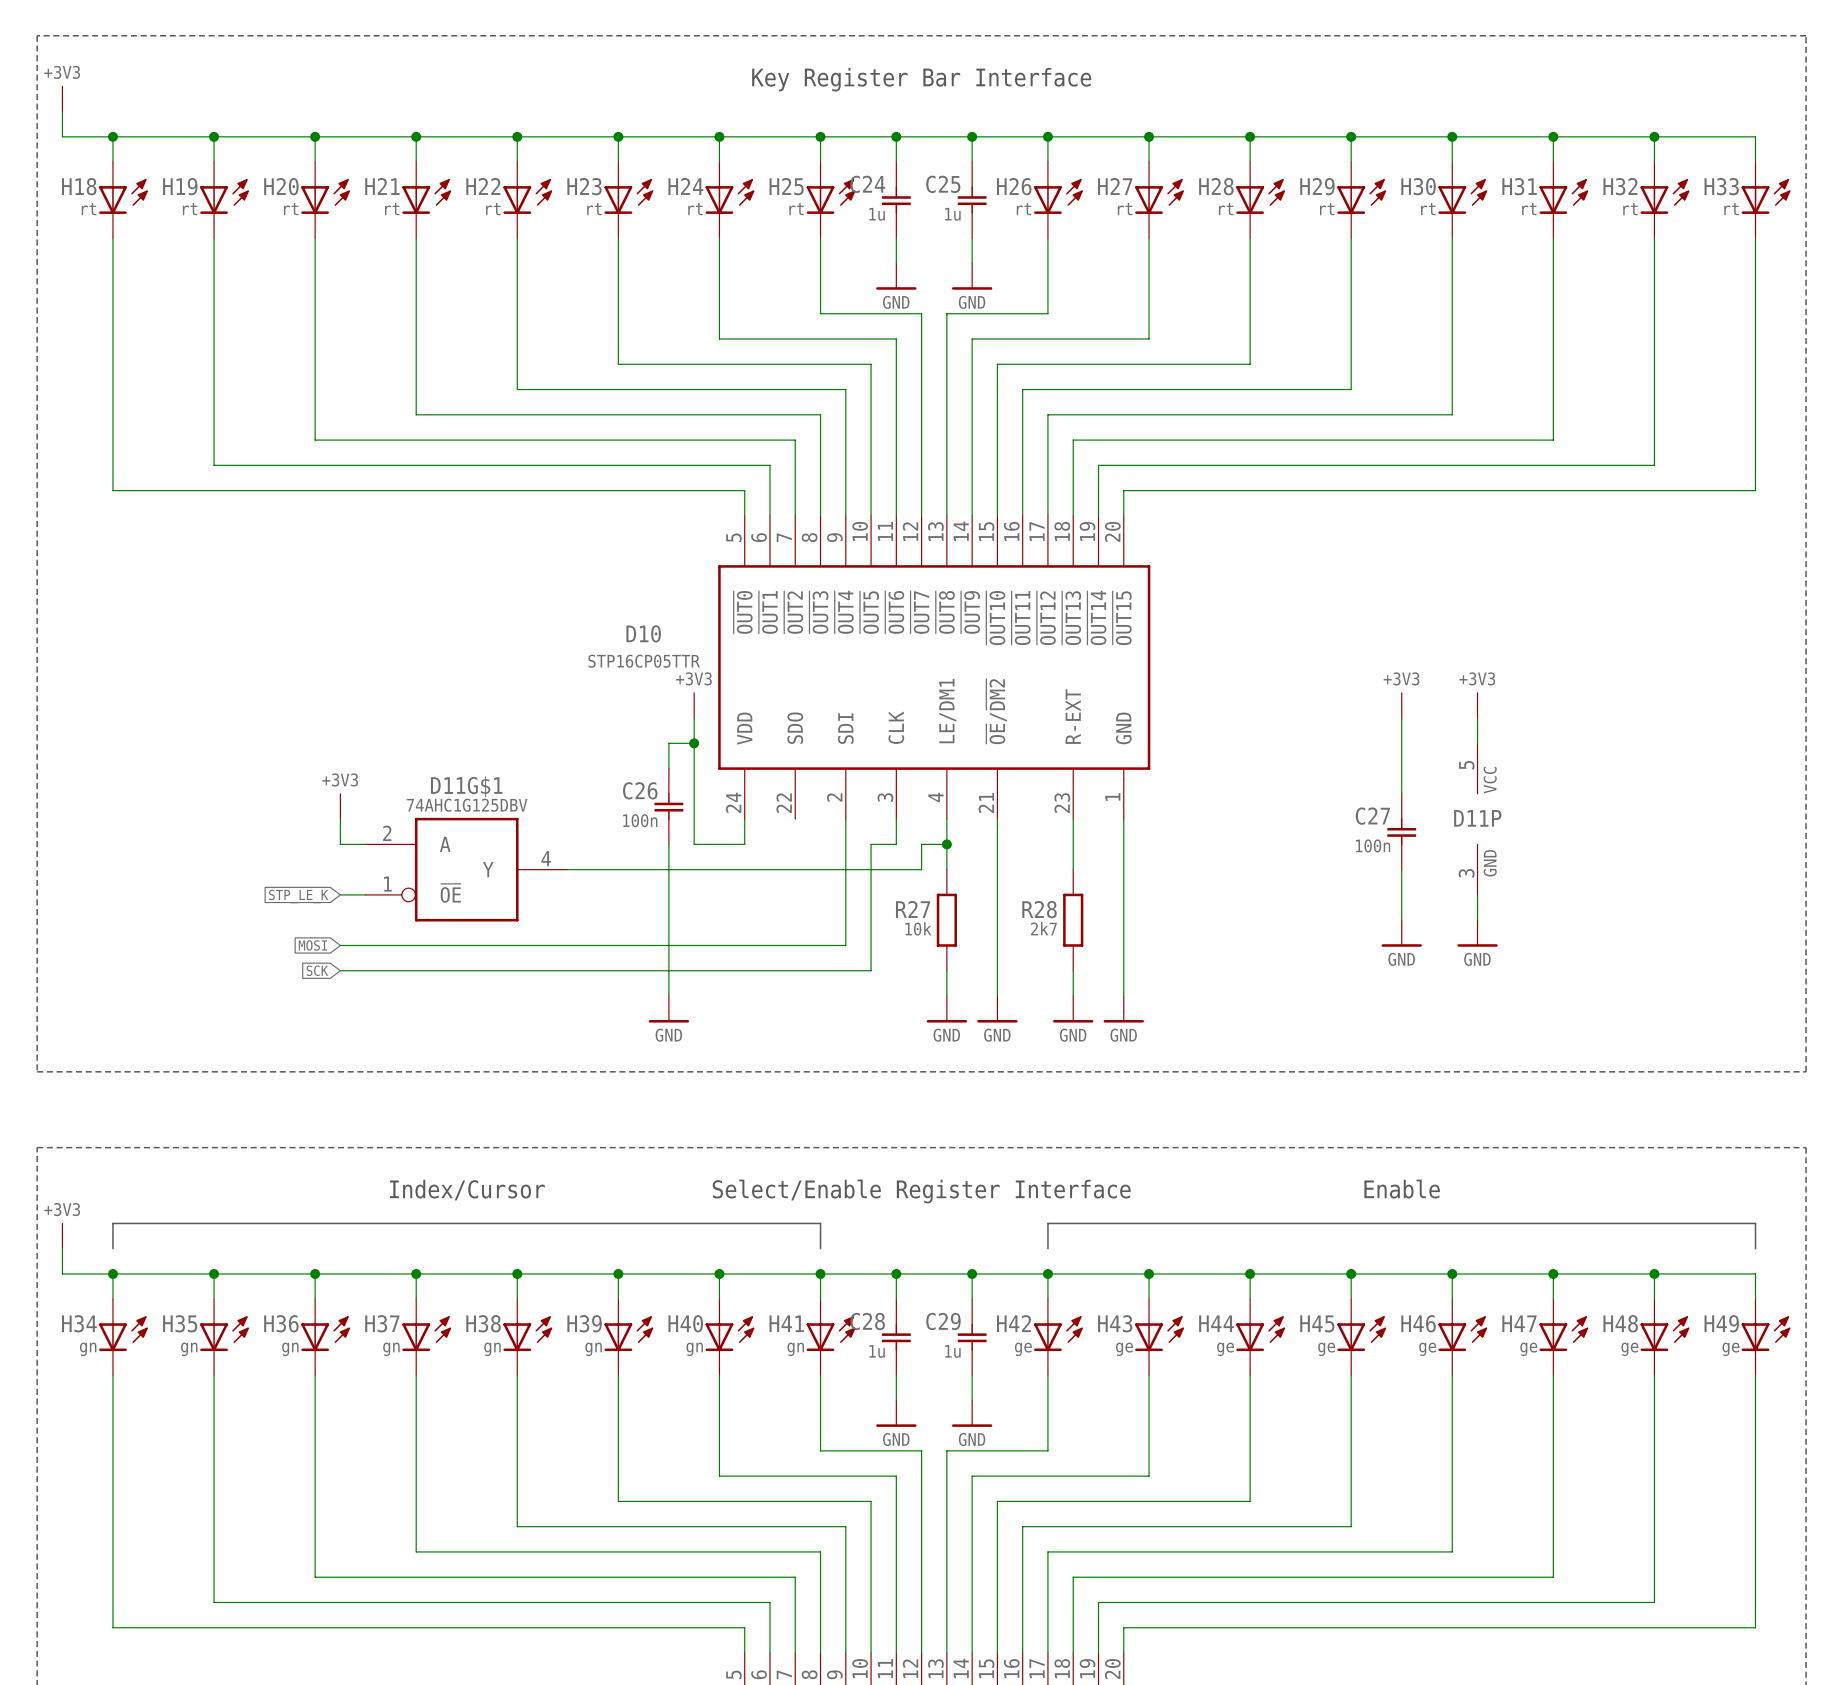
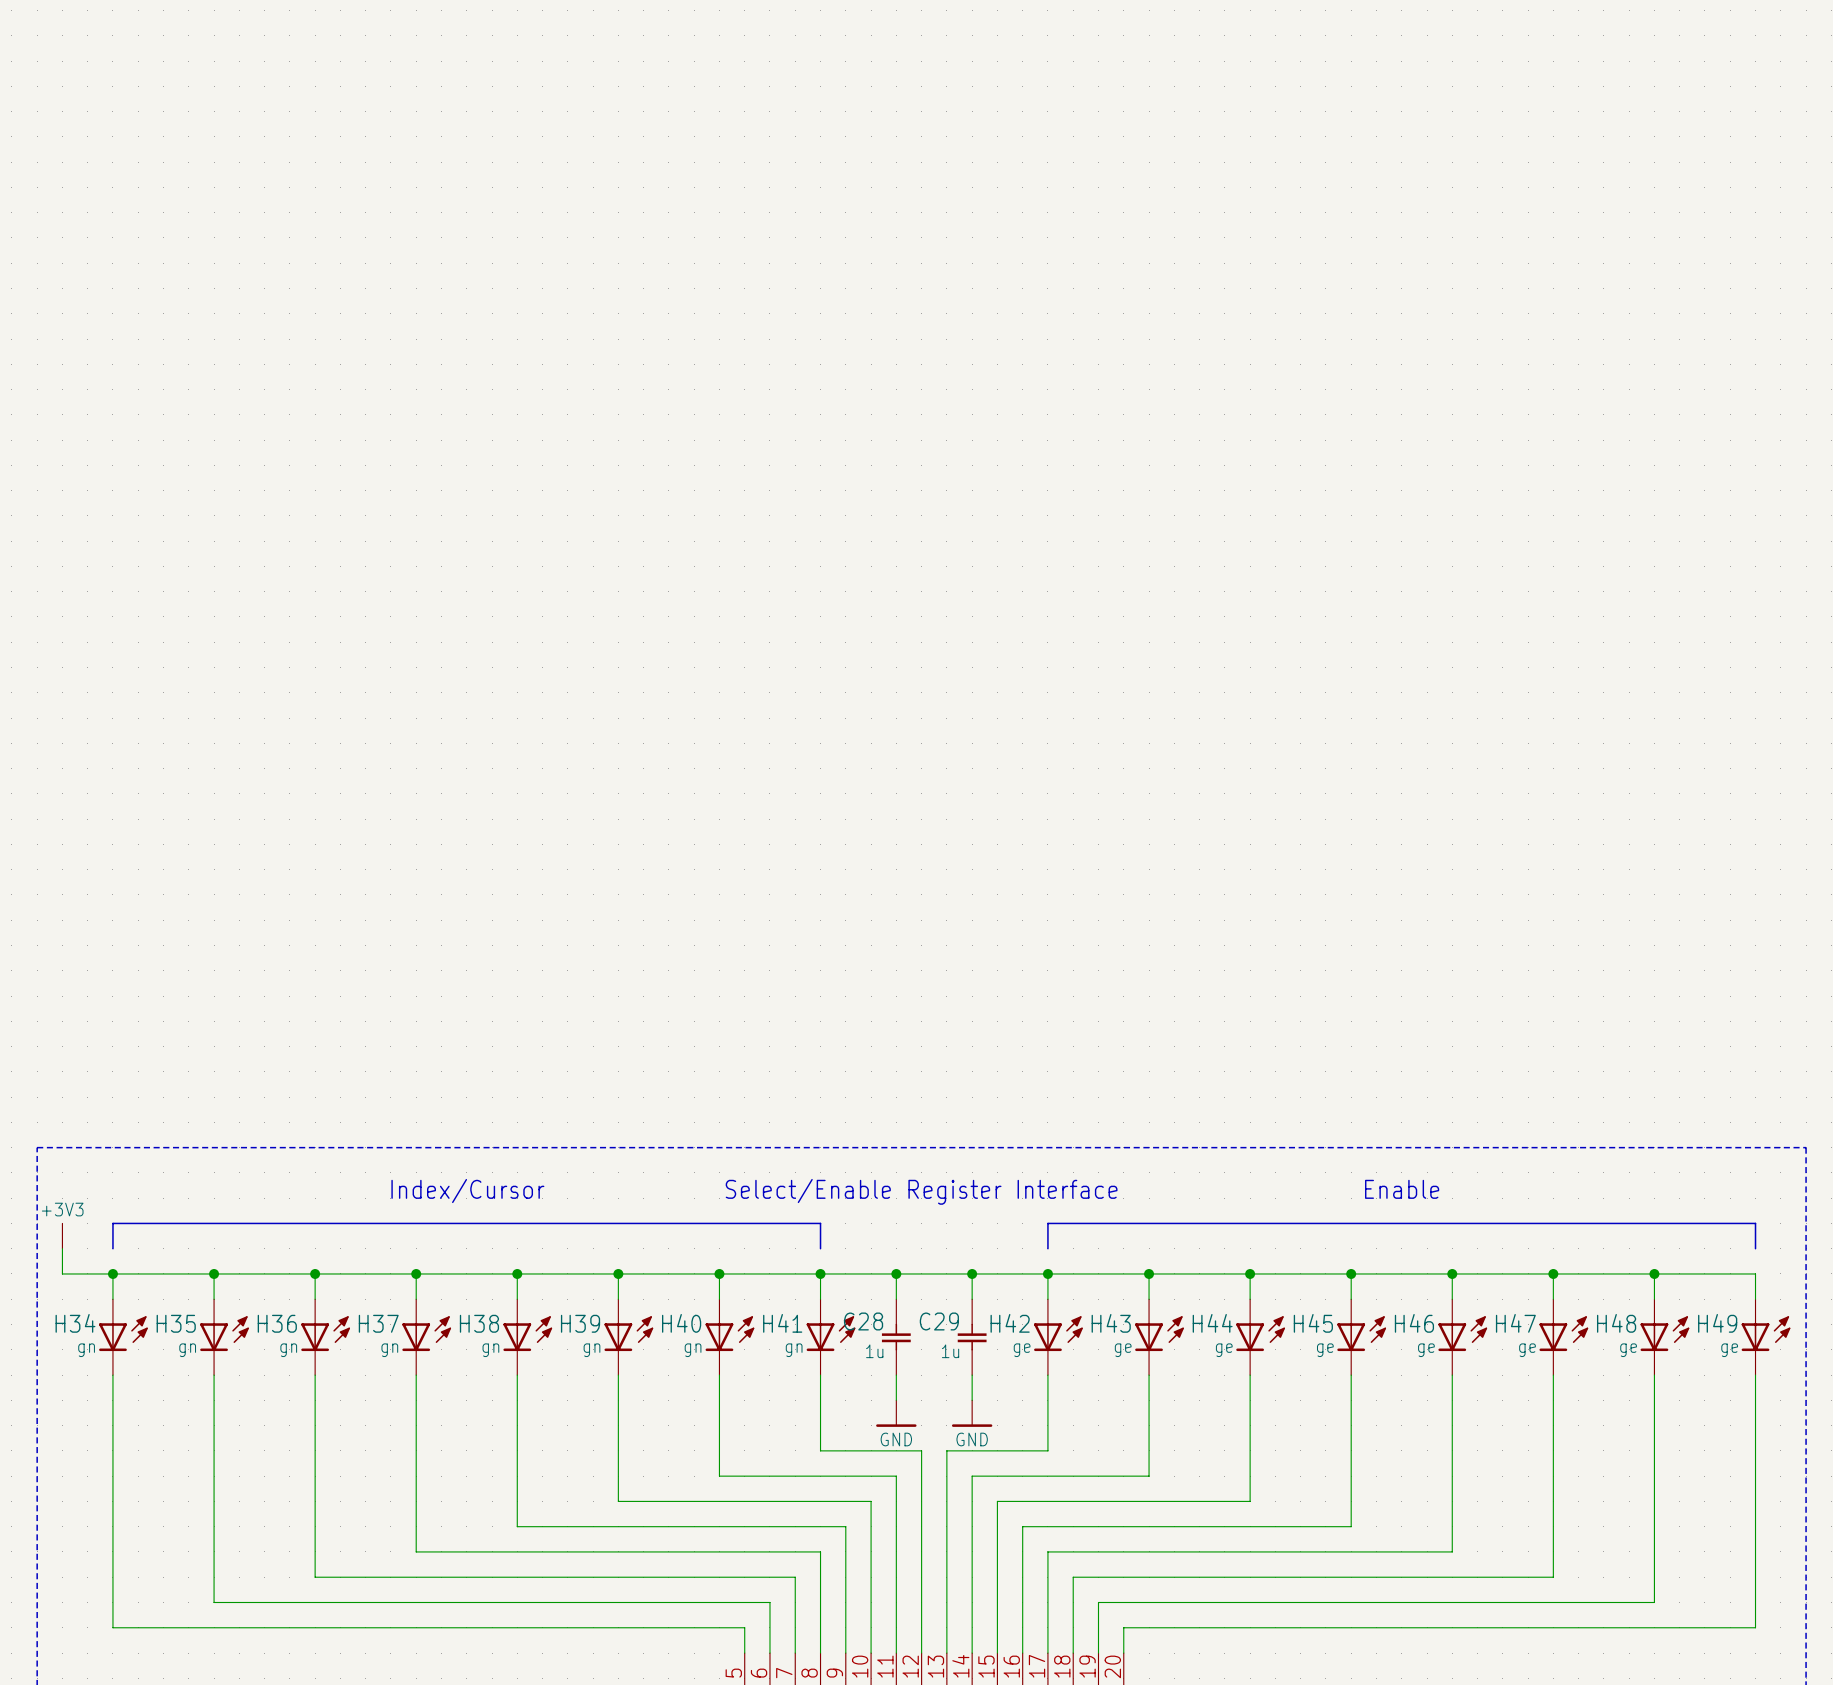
line: (37, 35) (37, 1071) (1806, 1071) (1806, 35) (37, 35) -> none
text: Key Register Bar Interface (921, 79) -> none
power symbol: +3V3 (62, 98) -> none
wire: (62, 111) (62, 136) (1755, 136) (1755, 162) -> none
wire: (112, 136) (112, 162) -> none
junction: (112, 136) -> none
wire: (214, 136) (214, 162) -> none
junction: (214, 136) -> none
wire: (315, 136) (315, 162) -> none
junction: (315, 136) -> none
wire: (416, 136) (416, 162) -> none
junction: (416, 136) -> none
wire: (517, 136) (517, 162) -> none
junction: (517, 136) -> none
wire: (618, 136) (618, 162) -> none
junction: (618, 136) -> none
wire: (719, 136) (719, 162) -> none
junction: (719, 136) -> none
wire: (820, 136) (820, 162) -> none
junction: (820, 136) -> none
wire: (896, 136) (896, 162) -> none
junction: (896, 136) -> none
wire: (972, 136) (972, 162) -> none
junction: (972, 136) -> none
wire: (1047, 136) (1047, 162) -> none
junction: (1047, 136) -> none
wire: (1149, 136) (1149, 162) -> none
junction: (1149, 136) -> none
wire: (1250, 136) (1250, 162) -> none
junction: (1250, 136) -> none
wire: (1351, 136) (1351, 162) -> none
junction: (1351, 136) -> none
wire: (1452, 136) (1452, 162) -> none
junction: (1452, 136) -> none
wire: (1553, 136) (1553, 162) -> none
junction: (1553, 136) -> none
wire: (1654, 136) (1654, 162) -> none
junction: (1654, 136) -> none
H18: rt (123, 200) -> none
H19: rt (224, 200) -> none
H20: rt (325, 200) -> none
H21: rt (426, 200) -> none
H22: rt (527, 200) -> none
H23: rt (628, 200) -> none
H24: rt (729, 200) -> none
H25: rt (831, 200) -> none
C24: 1u (896, 200) -> none
C25: 1u (972, 200) -> none
H26: rt (1058, 200) -> none
H27: rt (1159, 200) -> none
H28: rt (1260, 200) -> none
H29: rt (1361, 200) -> none
H30: rt (1462, 200) -> none
H31: rt (1563, 200) -> none
H32: rt (1664, 200) -> none
H33: rt (1766, 200) -> none
wire: (112, 237) (112, 490) (744, 490) (744, 515) -> none
wire: (214, 237) (214, 465) (769, 465) (769, 515) -> none
wire: (315, 237) (315, 440) (795, 440) (795, 515) -> none
wire: (416, 237) (416, 414) (820, 414) (820, 515) -> none
wire: (517, 237) (517, 389) (845, 389) (845, 515) -> none
wire: (618, 237) (618, 364) (871, 364) (871, 515) -> none
wire: (719, 237) (719, 339) (896, 339) (896, 515) -> none
wire: (820, 237) (820, 313) (921, 313) (921, 515) -> none
wire: (896, 237) (896, 263) -> none
wire: (972, 237) (972, 263) -> none
wire: (1047, 237) (1047, 313) (946, 313) (946, 515) -> none
wire: (1149, 237) (1149, 339) (972, 339) (972, 515) -> none
wire: (1250, 237) (1250, 364) (997, 364) (997, 515) -> none
wire: (1351, 237) (1351, 389) (1022, 389) (1022, 515) -> none
wire: (1452, 237) (1452, 414) (1047, 414) (1047, 515) -> none
wire: (1553, 237) (1553, 440) (1073, 440) (1073, 515) -> none
wire: (1654, 237) (1654, 465) (1098, 465) (1098, 515) -> none
wire: (1755, 237) (1755, 490) (1123, 490) (1123, 515) -> none
power symbol: GND (896, 276) -> none
power symbol: GND (972, 276) -> none
D10: STP16CP05TTR (934, 667) -> none
power symbol: +3V3 (694, 705) -> none
power symbol: +3V3 (1401, 705) -> none
power symbol: +3V3 (1477, 705) -> none
wire: (694, 718) (694, 844) (744, 844) (744, 819) -> none
wire: (1401, 718) (1401, 793) -> none
wire: (1477, 718) (1477, 743) -> none
wire: (694, 743) (668, 743) (668, 768) -> none
junction: (694, 743) -> none
power symbol: +3V3 (340, 806) -> none
C26: 100n (668, 806) -> none
wire: (340, 819) (340, 844) (365, 844) -> none
wire: (845, 819) (845, 945) (340, 945) -> none
wire: (896, 819) (896, 844) (871, 844) (871, 970) (340, 970) -> none
wire: (946, 819) (946, 869) -> none
wire: (997, 819) (997, 996) -> none
wire: (1073, 819) (1073, 869) -> none
wire: (1123, 819) (1123, 996) -> none
D11P: (1477, 819) -> none
C27: 100n (1401, 831) -> none
wire: (668, 844) (668, 996) -> none
wire: (946, 844) (921, 844) (921, 869) (567, 869) -> none
junction: (946, 844) -> none
D11G$1: 74AHC1G125DBV (466, 869) -> none
wire: (1401, 869) (1401, 920) -> none
wire: (340, 894) (365, 894) -> none
wire: (1477, 894) (1477, 920) -> none
global label: STP_LE_K (298, 896) -> none
R27: 10k (946, 920) -> none
R28: 2k7 (1073, 920) -> none
power symbol: GND (1401, 933) -> none
power symbol: GND (1477, 933) -> none
global label: MOSI (312, 945) -> none
global label: SCK (317, 970) -> none
wire: (946, 970) (946, 996) -> none
wire: (1073, 970) (1073, 996) -> none
power symbol: GND (668, 1009) -> none
power symbol: GND (946, 1009) -> none
power symbol: GND (997, 1009) -> none
power symbol: GND (1073, 1009) -> none
power symbol: GND (1123, 1009) -> none

